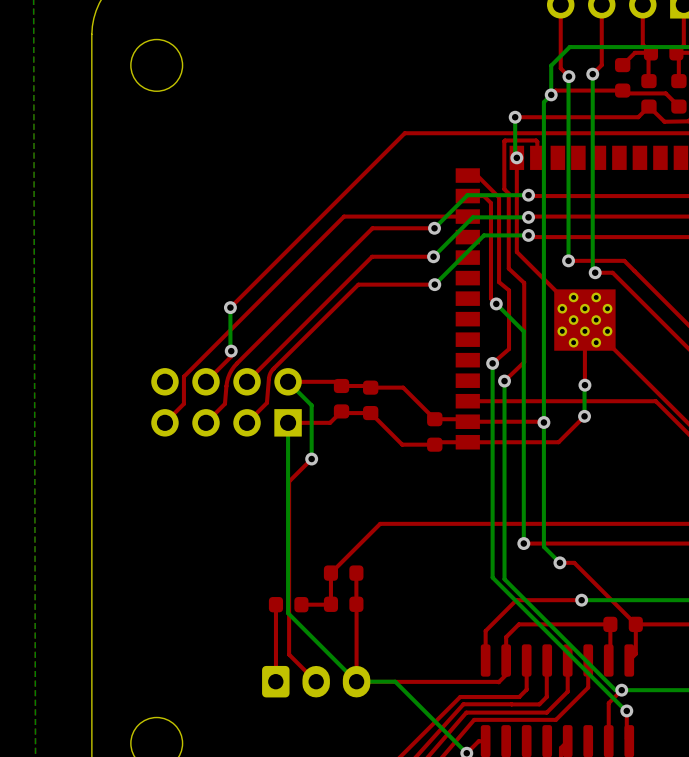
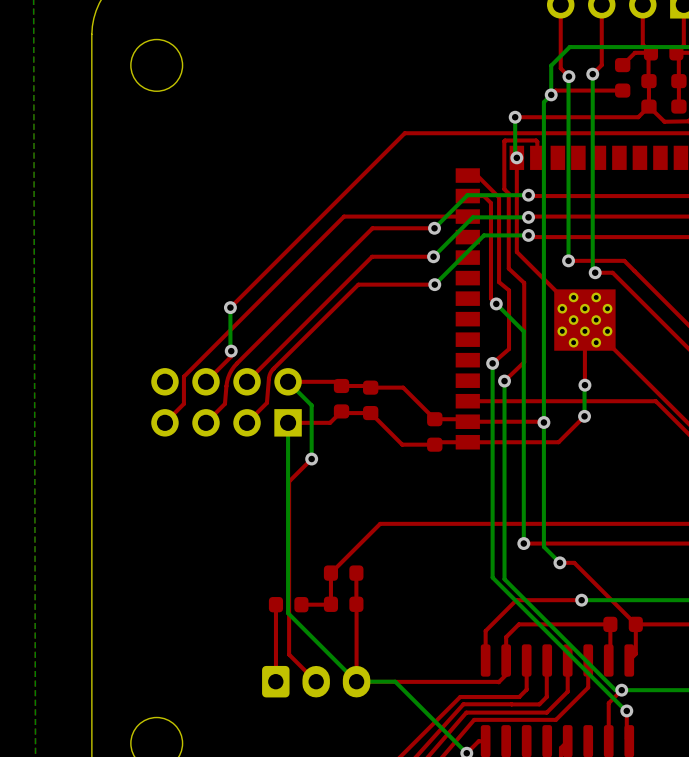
top track: none -> (648, 81) (648, 106)
top track: (622, 90) (625, 93) (665, 93) (678, 106) -> (678, 81) (678, 106)

